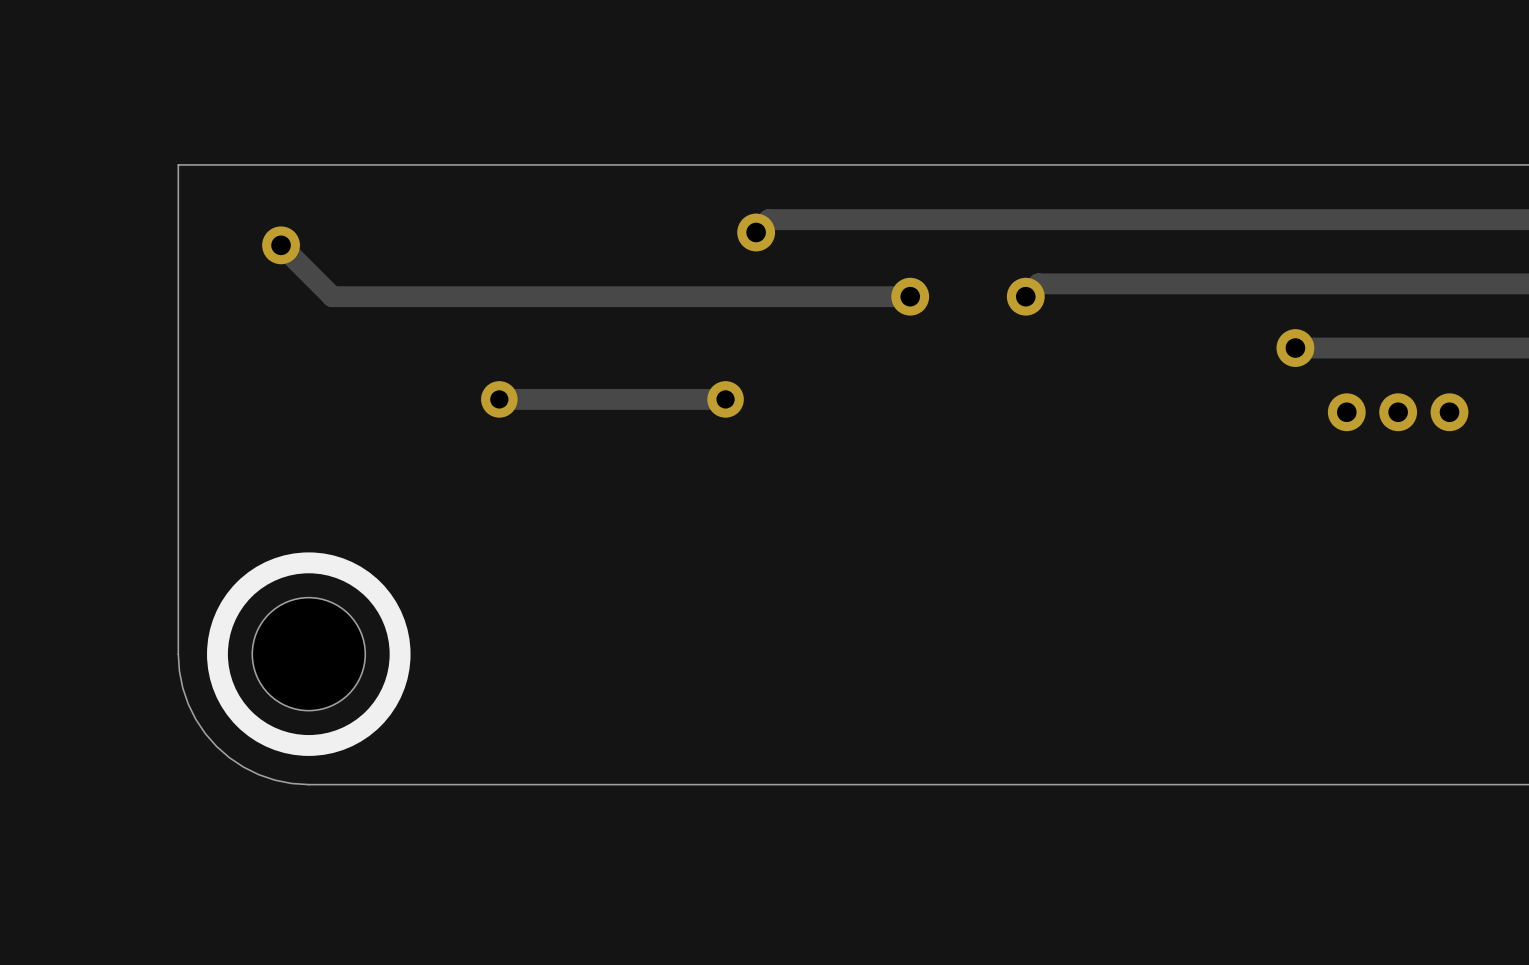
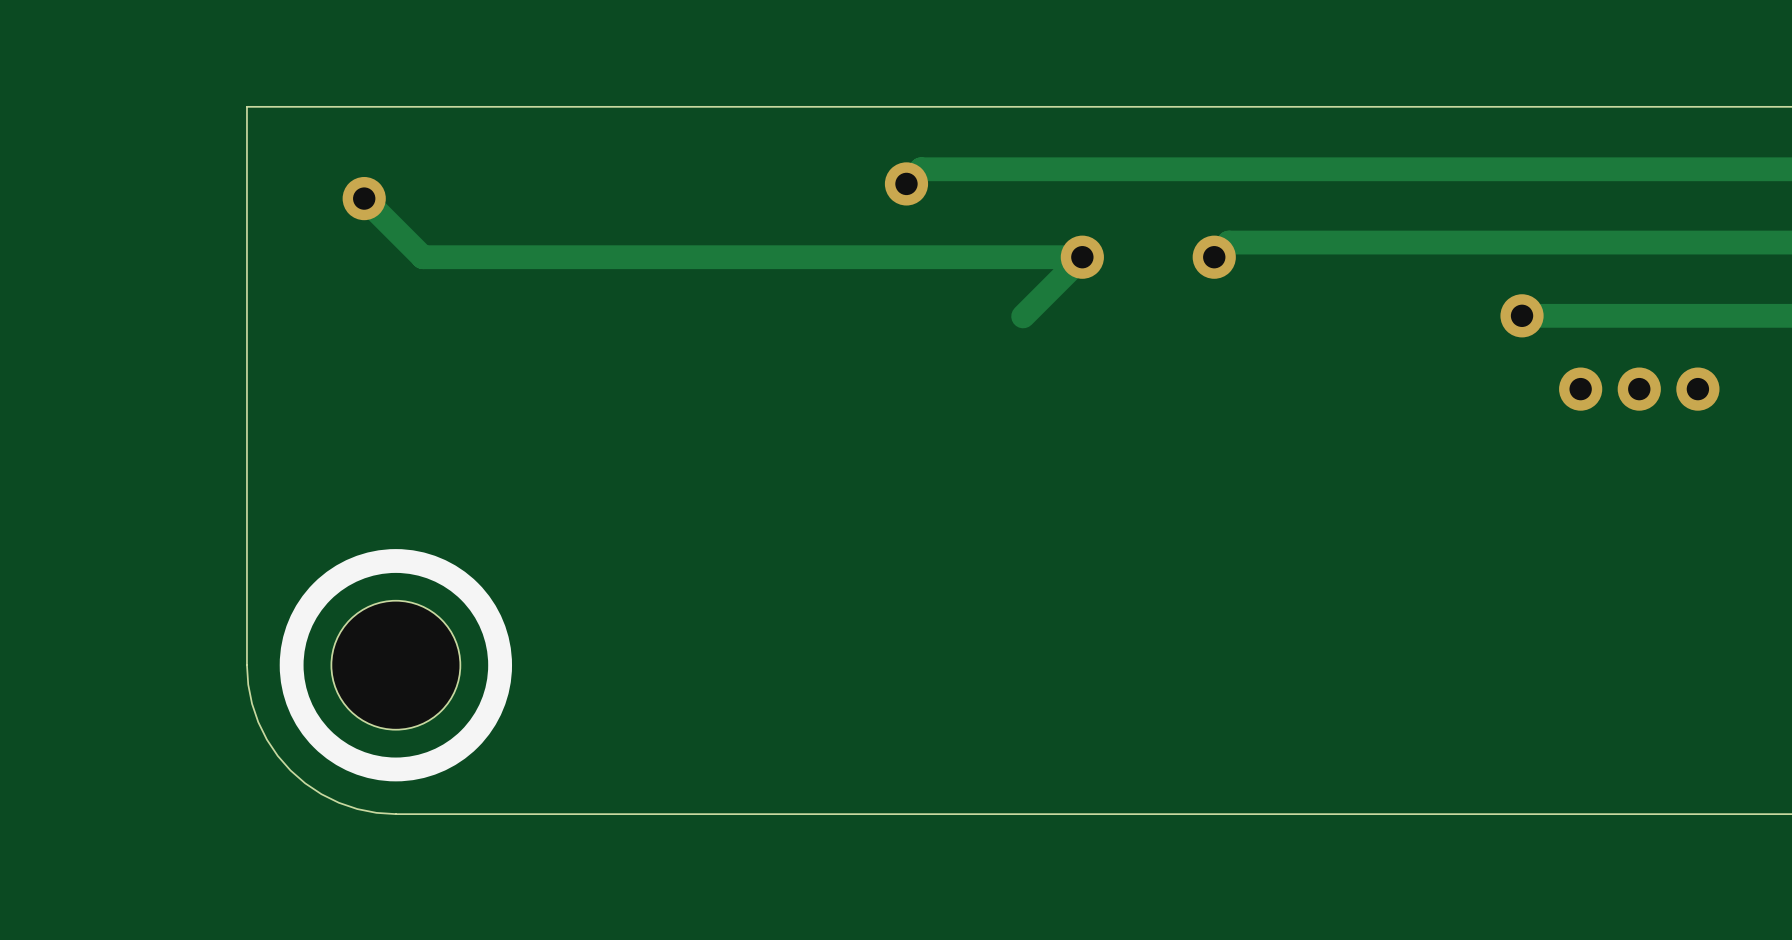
track: none -> (1082, 257) (1023, 316)
track: (499, 399) (725, 399) -> none
via: (499, 399) -> none
via: (725, 399) -> none

